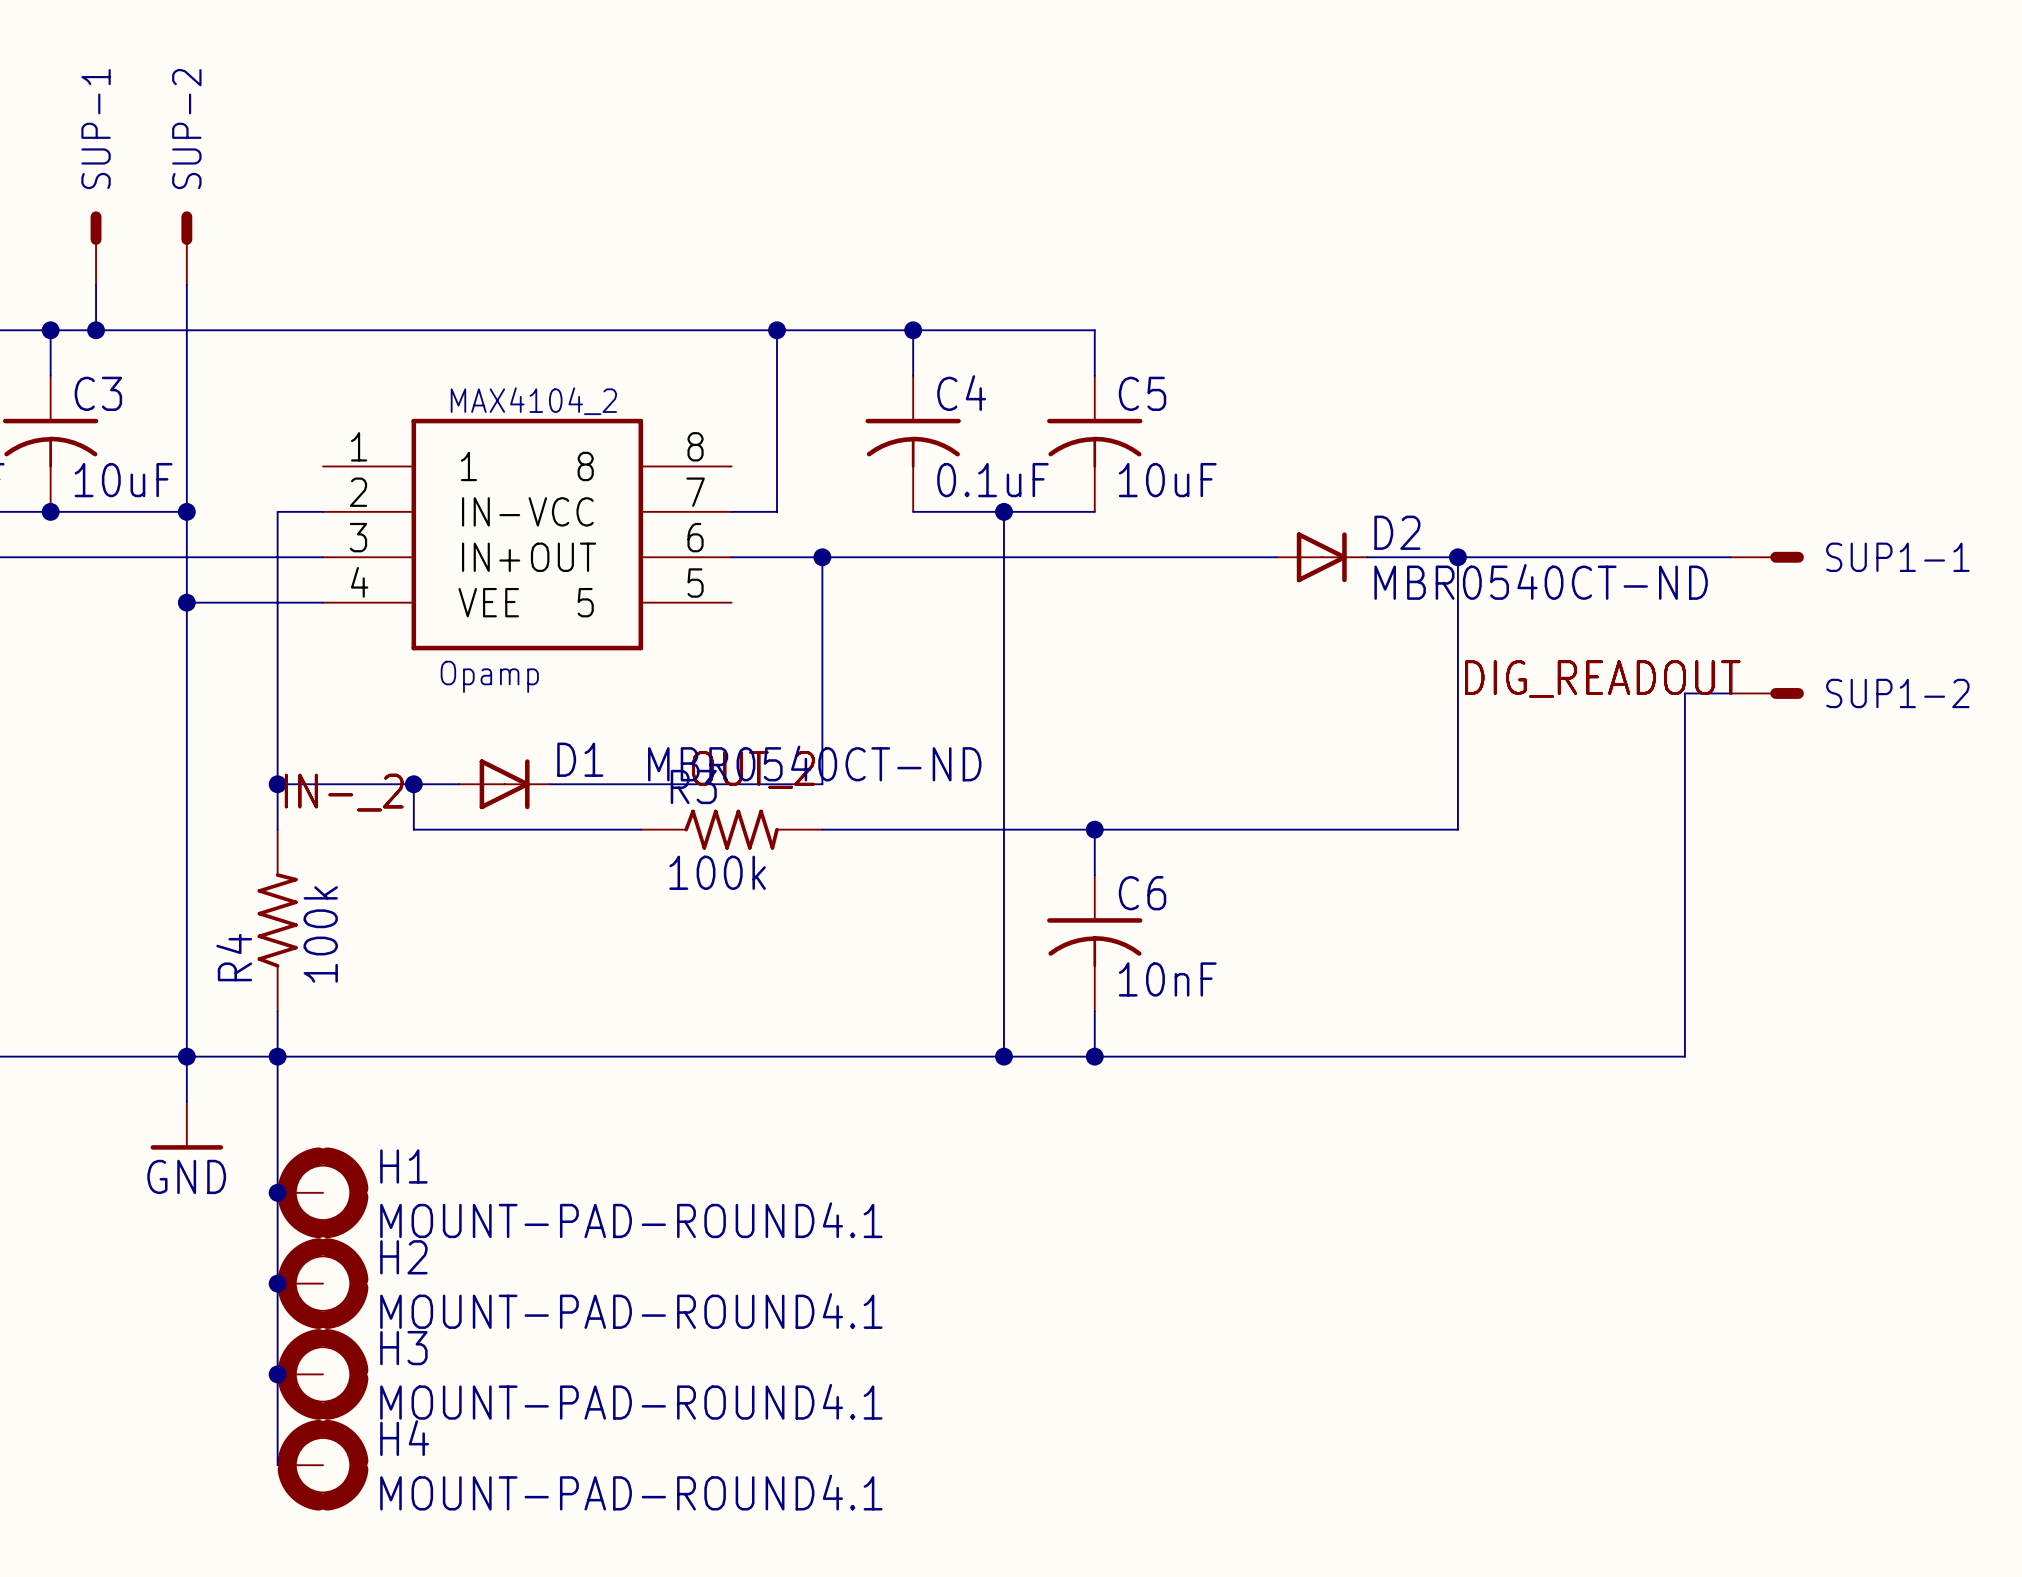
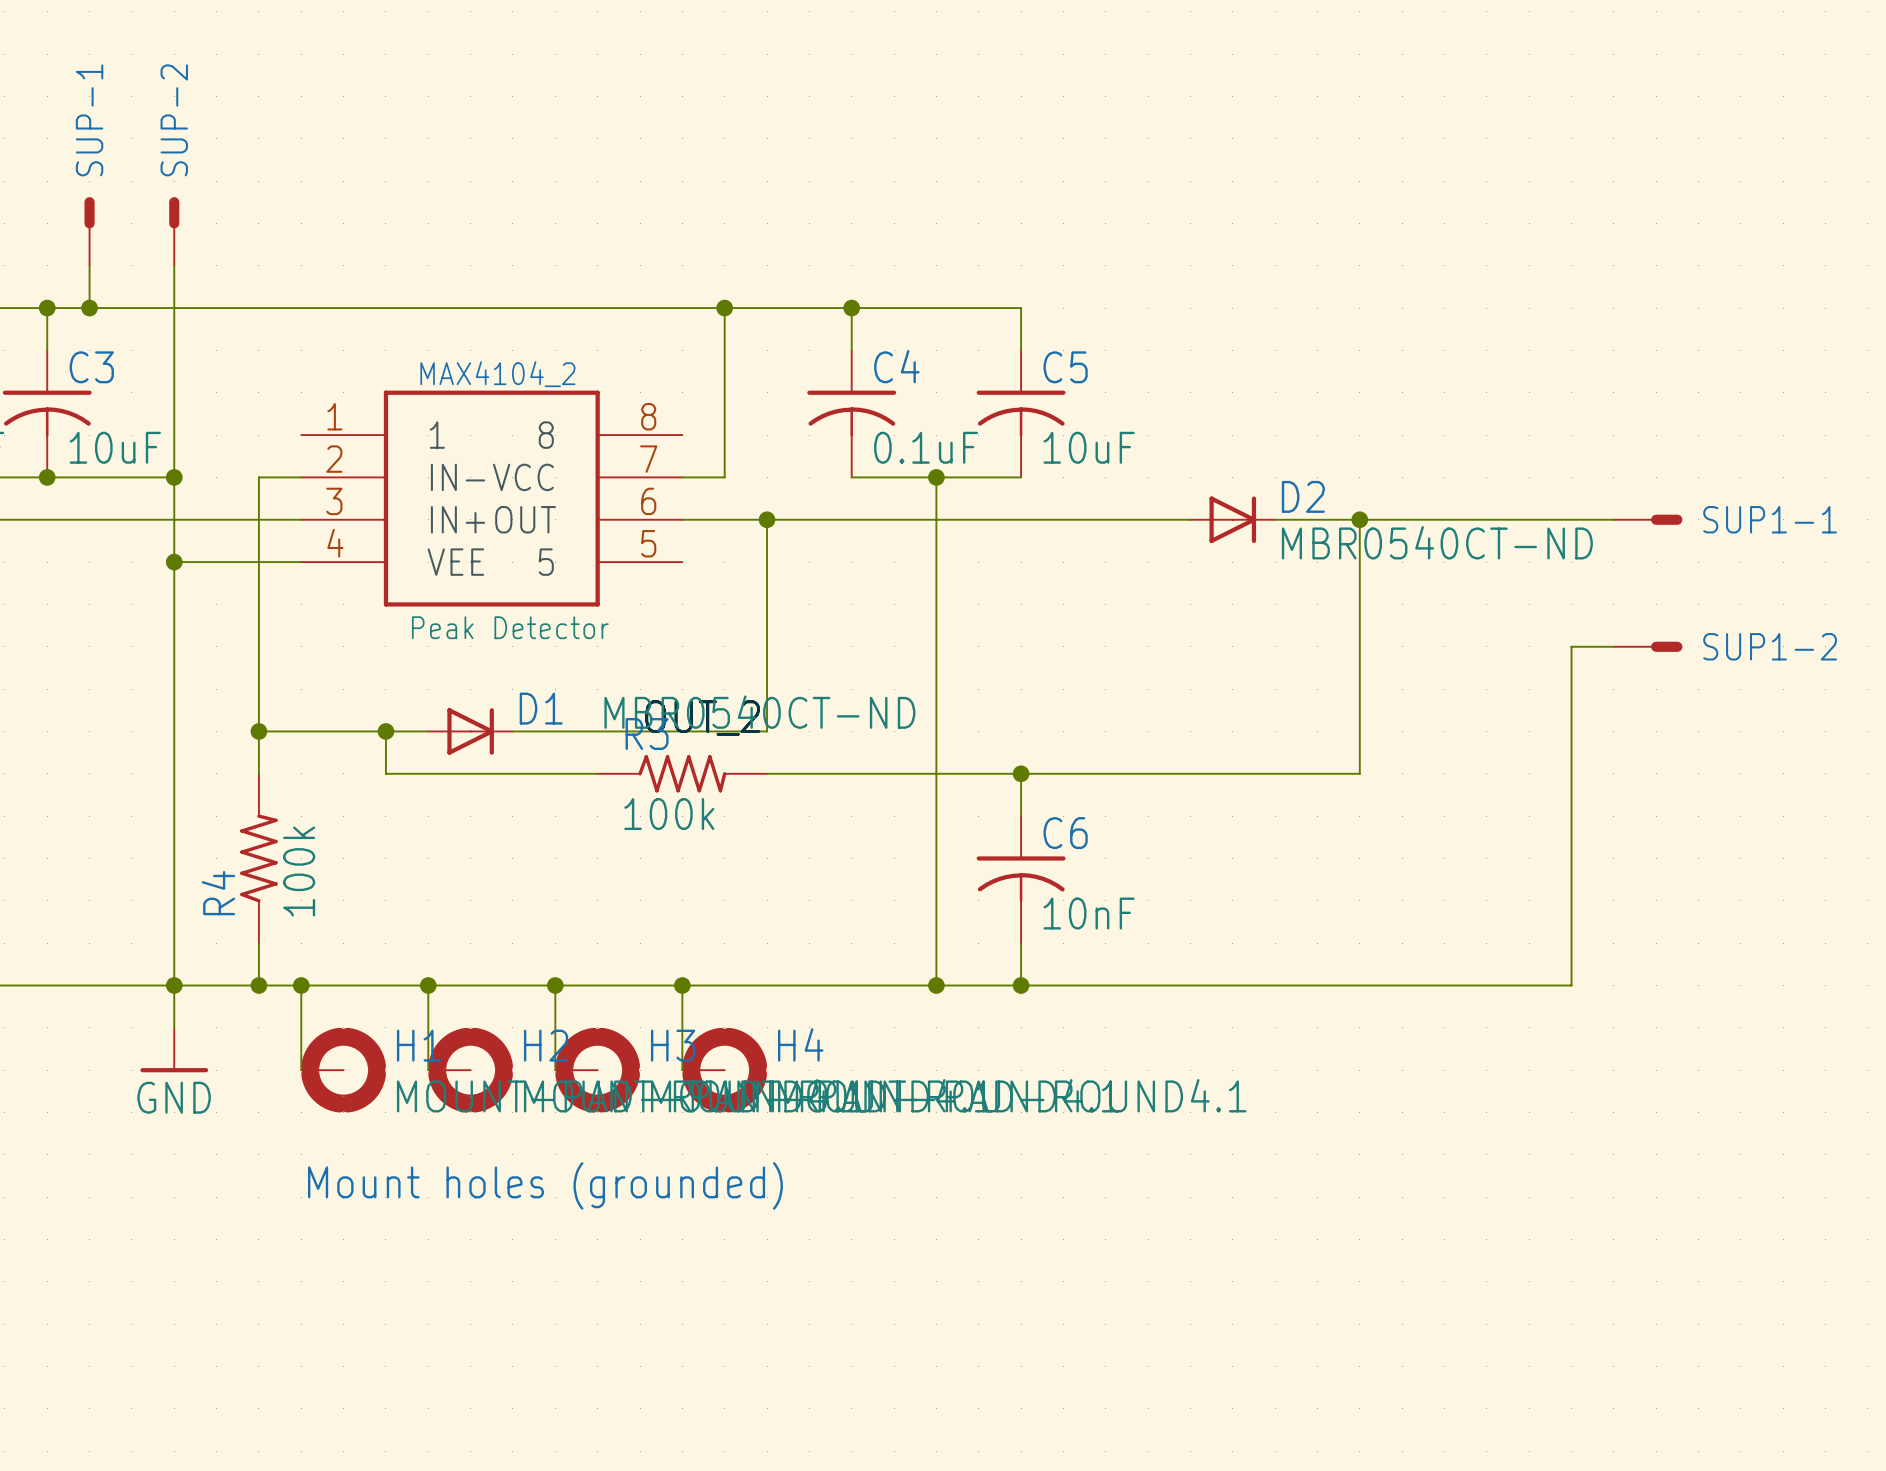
MAX4104_2 value: Opamp (489, 676) -> Peak Detector (510, 627)
label: DIG_READOUT (1602, 679) -> none
label: IN-_2 (344, 792) -> none
wire: (277, 1056) (277, 1465) -> none
wire: none -> (301, 985) (301, 1070)
junction: none -> (301, 985)
wire: none -> (428, 985) (428, 1070)
junction: none -> (428, 985)
wire: none -> (555, 985) (555, 1070)
junction: none -> (555, 985)
wire: none -> (682, 985) (682, 1070)
junction: none -> (682, 985)
junction: (277, 1192) -> none
H1 position: (323, 1192) -> (343, 1070)
text: none -> Mount holes (grounded) (545, 1185)
junction: (277, 1283) -> none
H2 position: (323, 1283) -> (470, 1070)
junction: (277, 1374) -> none
H3 position: (323, 1374) -> (597, 1070)
H4 position: (323, 1465) -> (724, 1070)

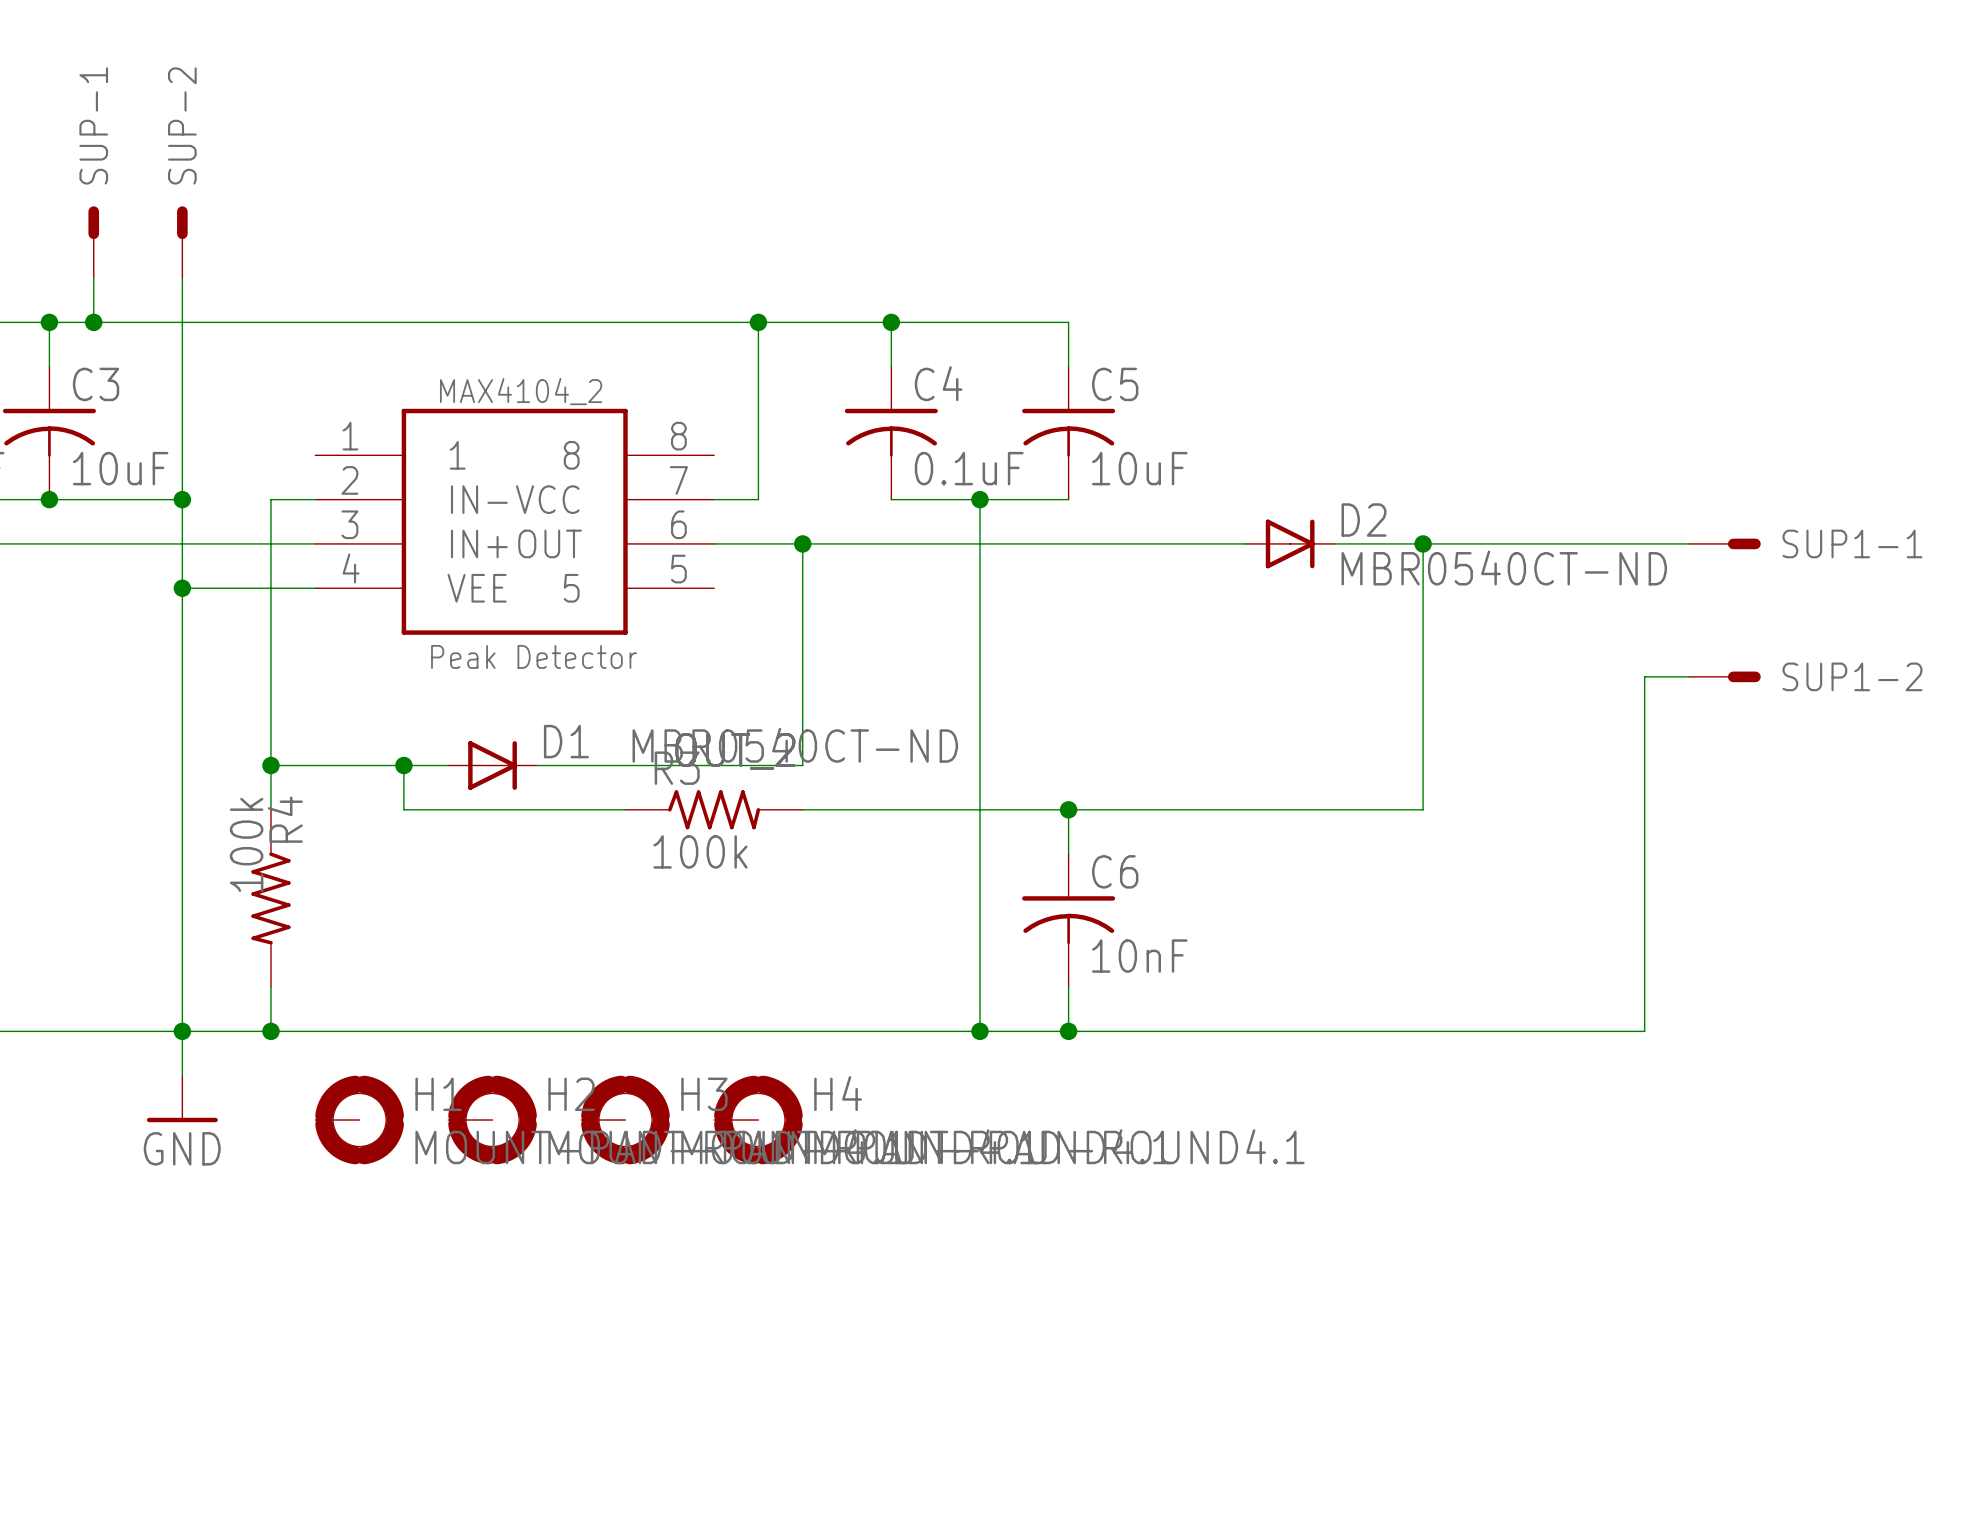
R4 rotation: 0° (258, 858) -> 180° (270, 898)
R4 value position: 100k (299, 871) -> 100k (246, 844)
R4 name position: R4 (218, 893) -> R4 (285, 819)
wire: (301, 985) (301, 1070) -> none
junction: (301, 985) -> none
wire: (428, 985) (428, 1070) -> none
junction: (428, 985) -> none
wire: (555, 985) (555, 1070) -> none
junction: (555, 985) -> none
wire: (682, 985) (682, 1070) -> none
junction: (682, 985) -> none
text: Mount holes (grounded) (545, 1185) -> none

